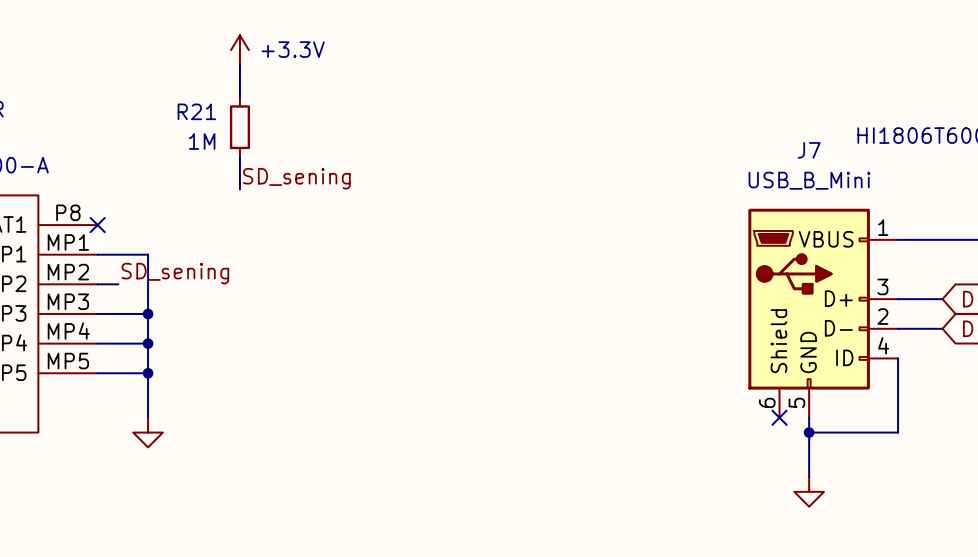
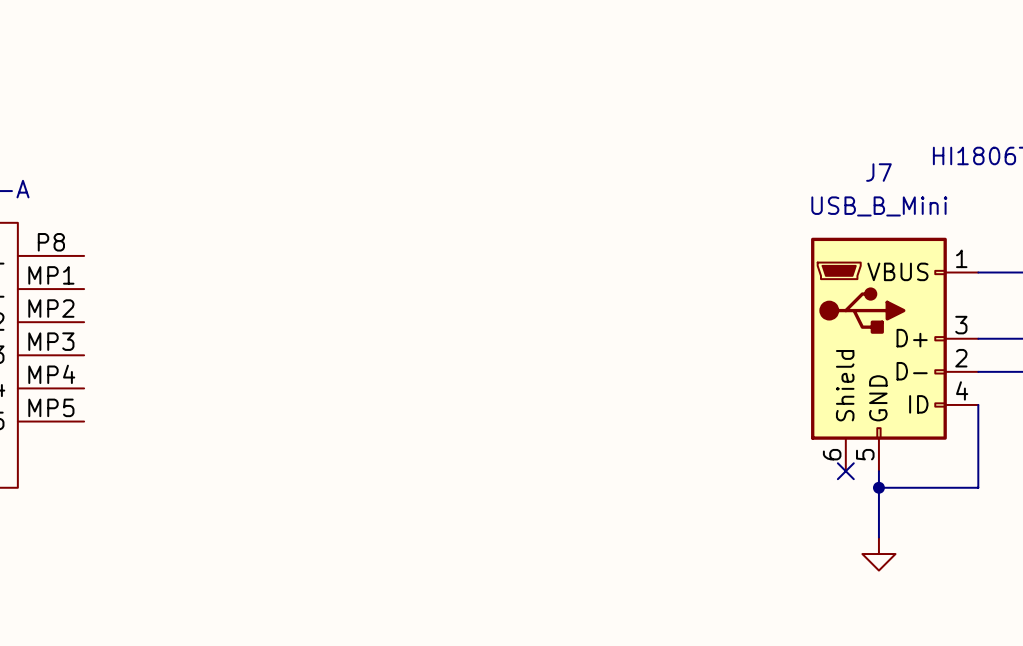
power symbol: +3.3V (239, 50) -> none
wire: (239, 64) (239, 97) -> none
R21: 1M (239, 127) -> none
wire: (239, 156) (239, 189) -> none
label: SD_sening (296, 178) -> none
no-connect mark: (97, 225) -> none
wire: (97, 254) (148, 254) (148, 417) -> none
label: SD_sening (175, 273) -> none
wire: (97, 284) (118, 284) -> none
wire: (97, 313) (148, 313) -> none
junction: (148, 313) -> none
wire: (97, 343) (148, 343) -> none
junction: (148, 343) -> none
wire: (97, 373) (148, 373) -> none
junction: (148, 373) -> none
power symbol: (148, 432) -> none

